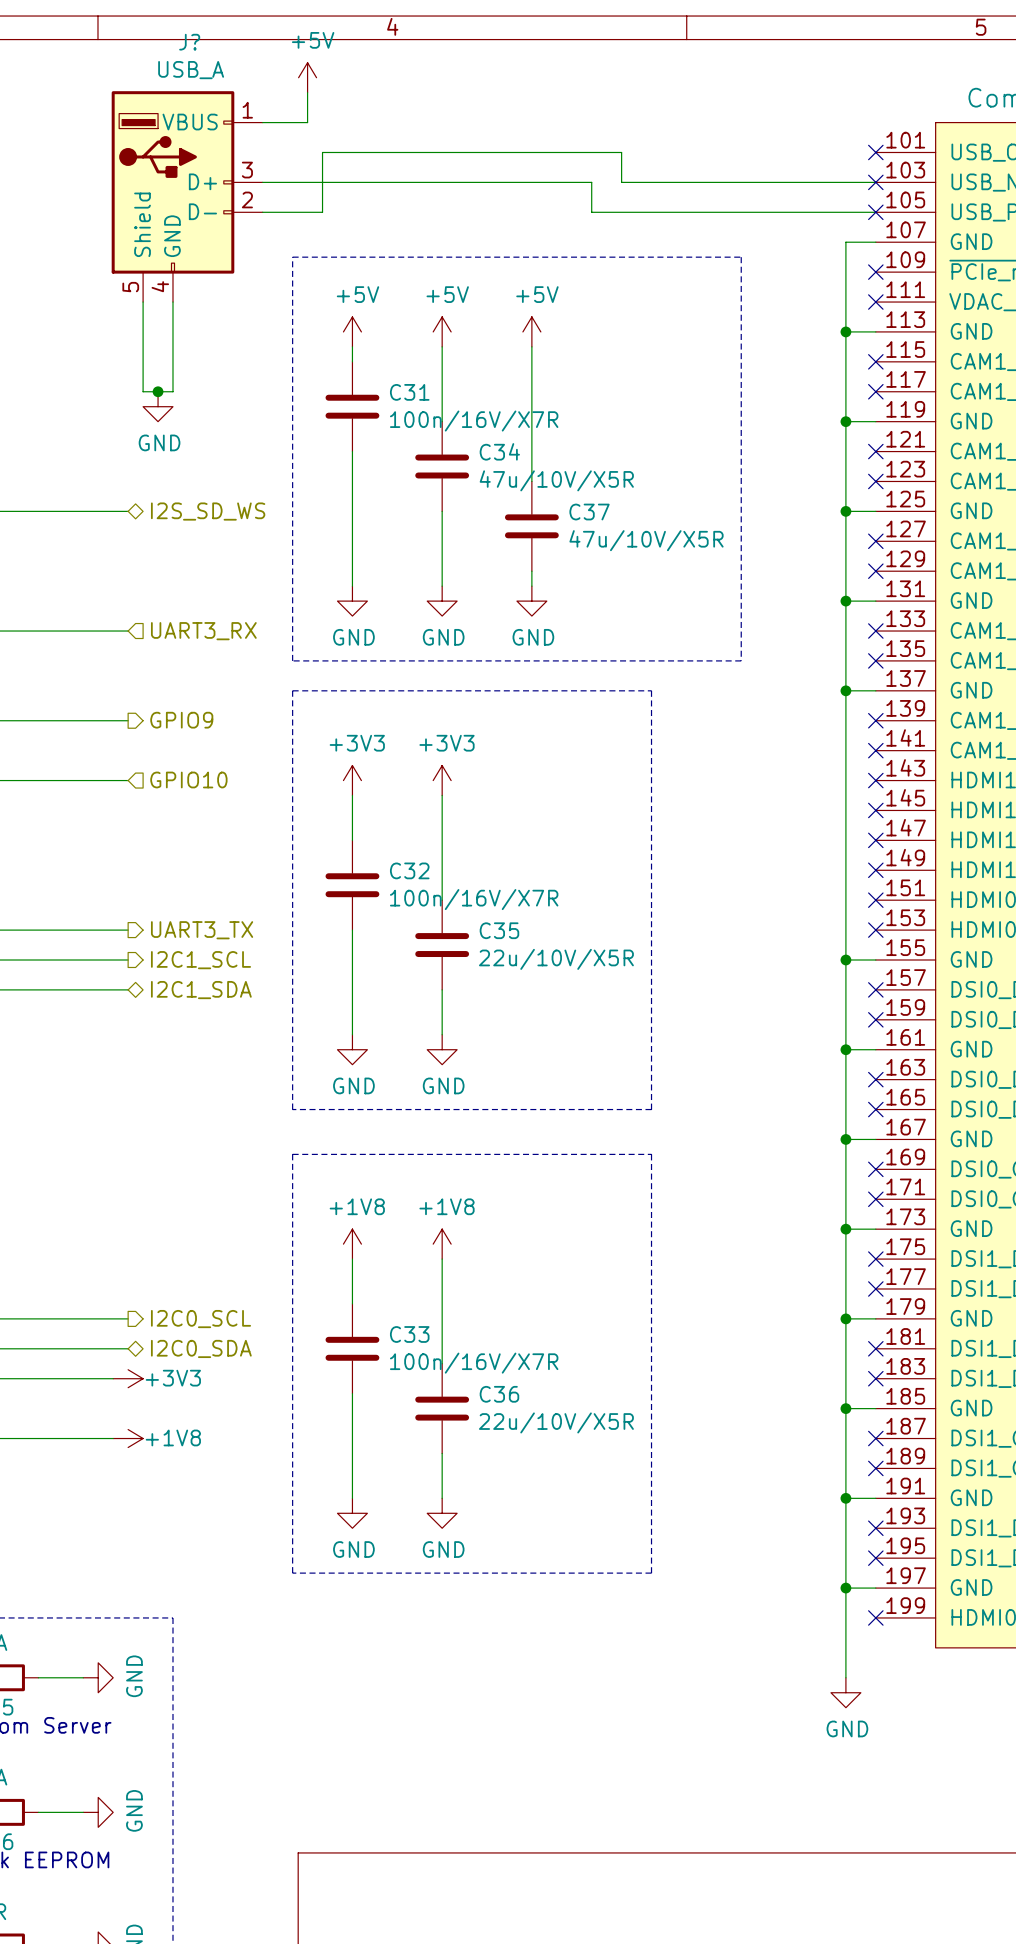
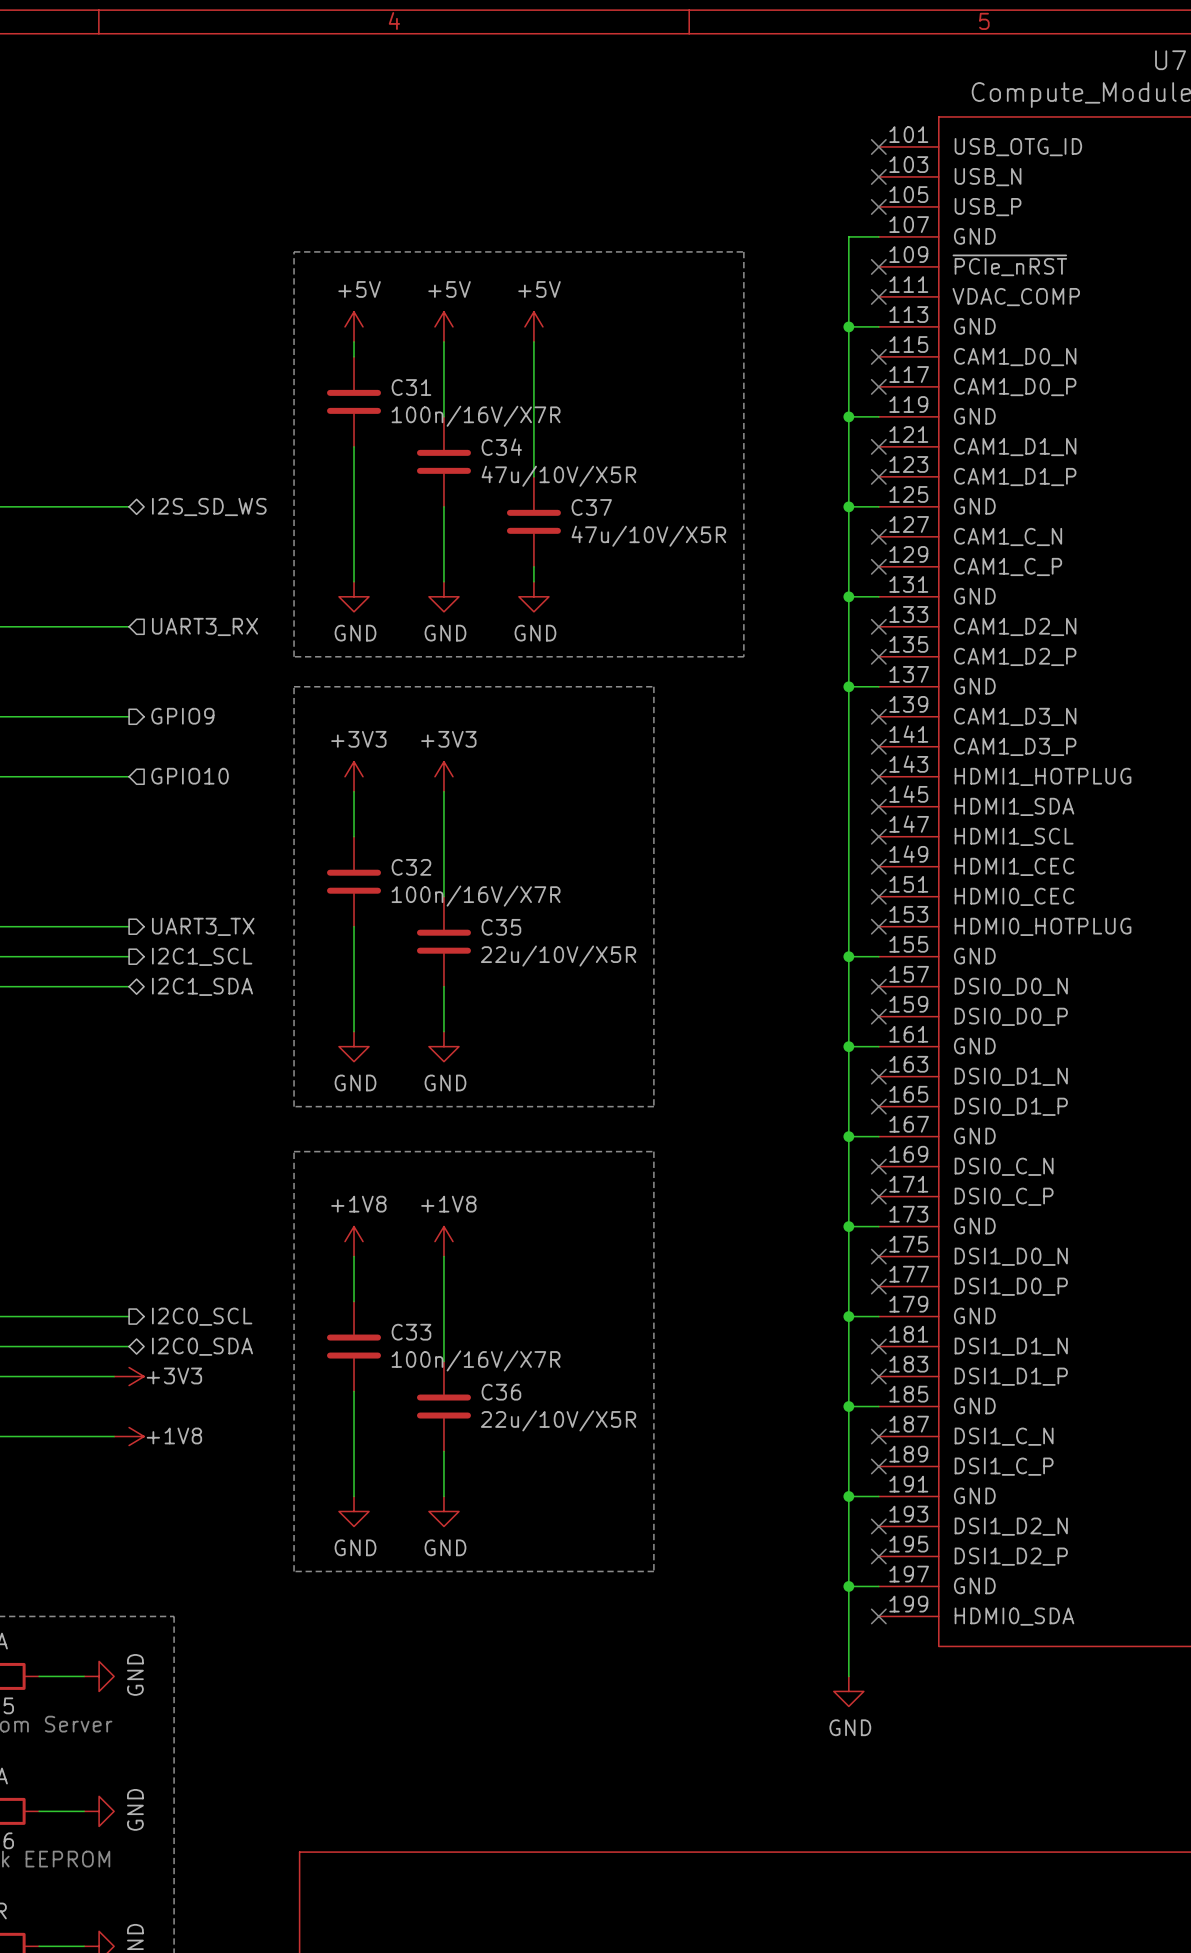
power symbol: +5V (307, 77) -> none
wire: (307, 92) (307, 122) (262, 122) -> none
wire: (262, 182) (591, 182) (591, 212) (875, 212) -> none
wire: (875, 182) (621, 182) (621, 152) (322, 152) (322, 212) (262, 212) -> none
J?: USB_A (187, 196) -> none
wire: (143, 302) (143, 391) (172, 391) (172, 302) -> none
junction: (158, 391) -> none
power symbol: GND (158, 406) -> none

